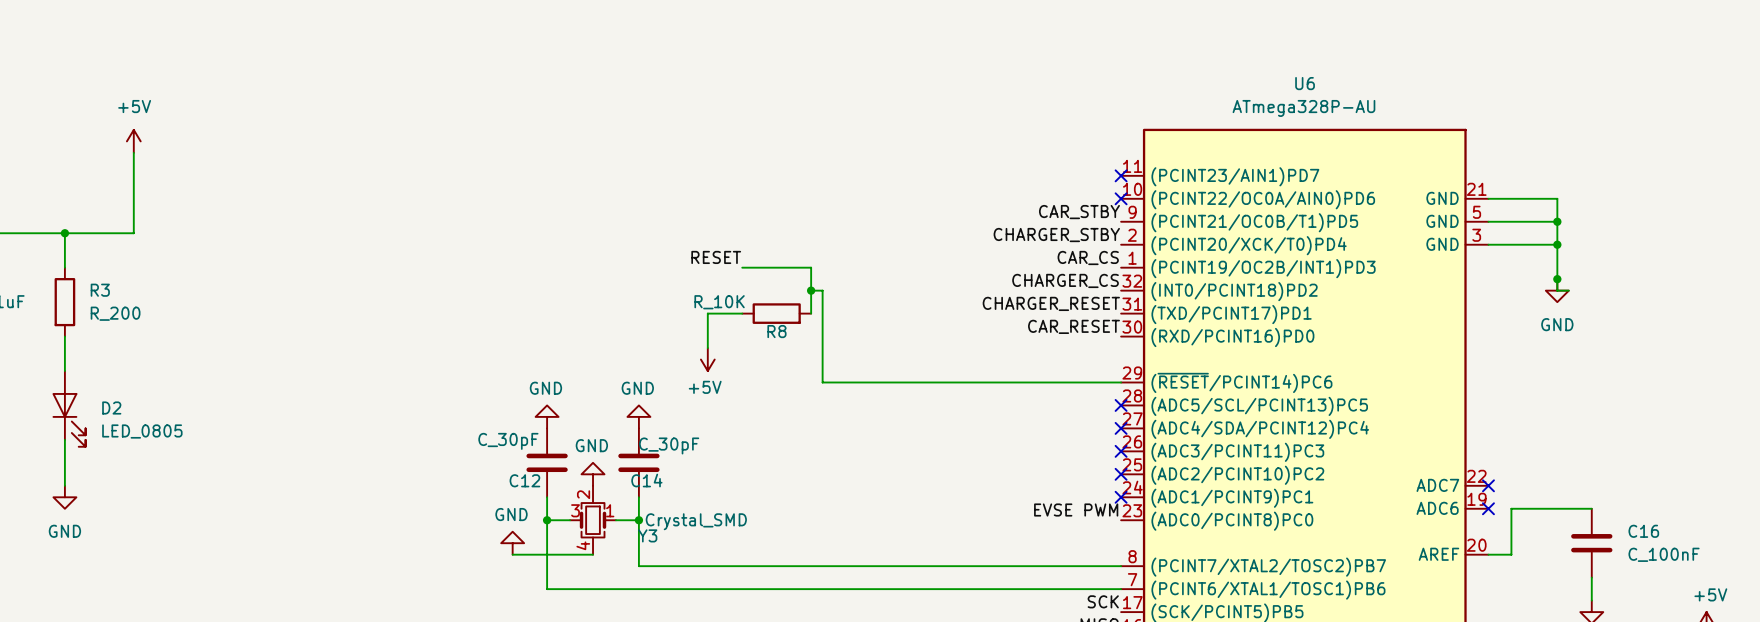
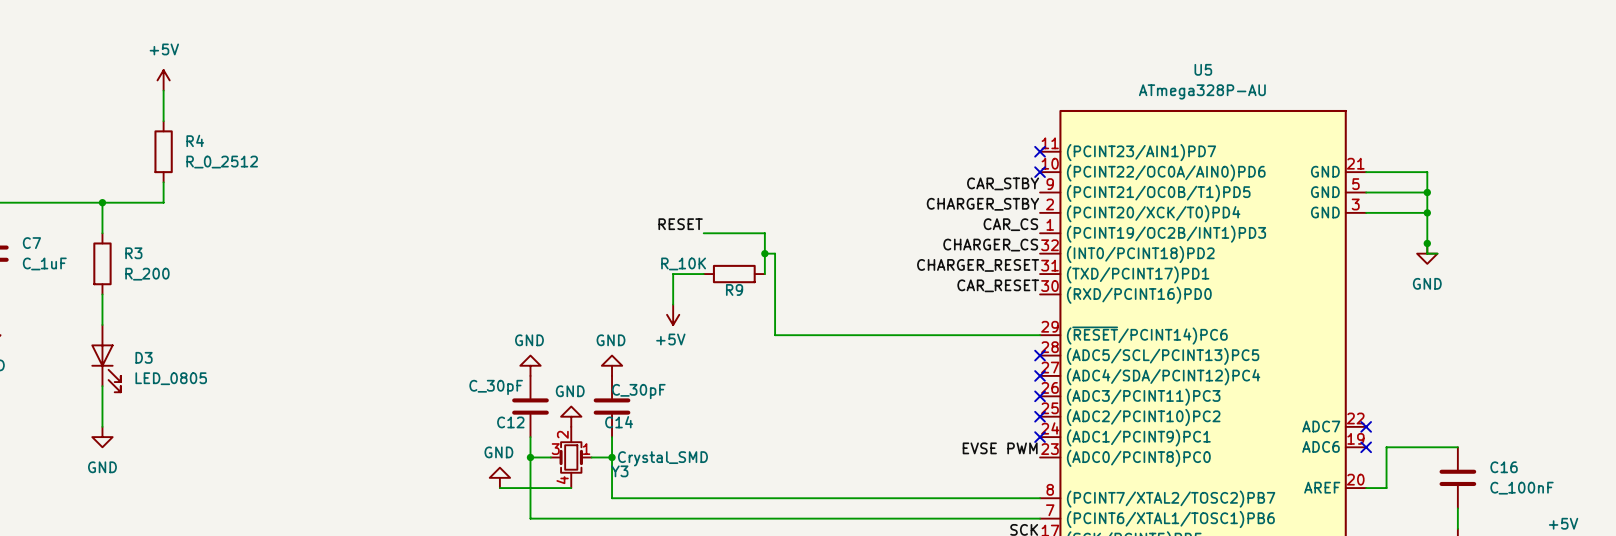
U6 name: U6 (1305, 83) -> U5 (1203, 69)
wire: none -> (163, 90) (163, 121)
power symbol position: +5V (133, 141) -> +5V (163, 80)
wire: (133, 152) (133, 210) -> none
R4: none -> R_0_2512 (163, 151)
R8 name: R8 (776, 331) -> R9 (734, 289)
D2 name: D2 (111, 408) -> D3 (144, 357)

